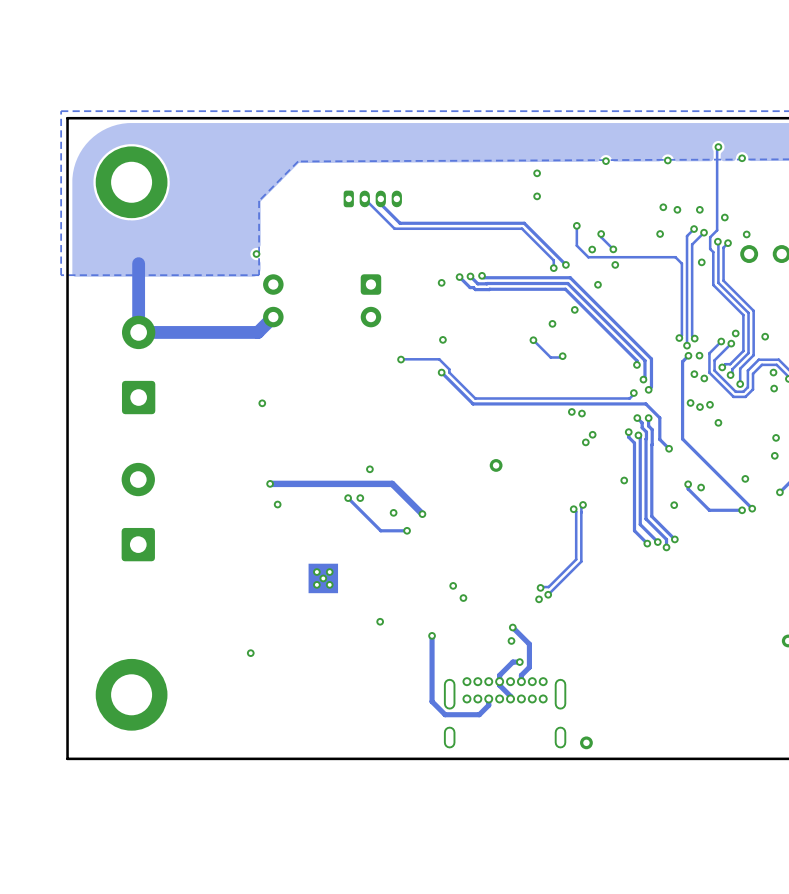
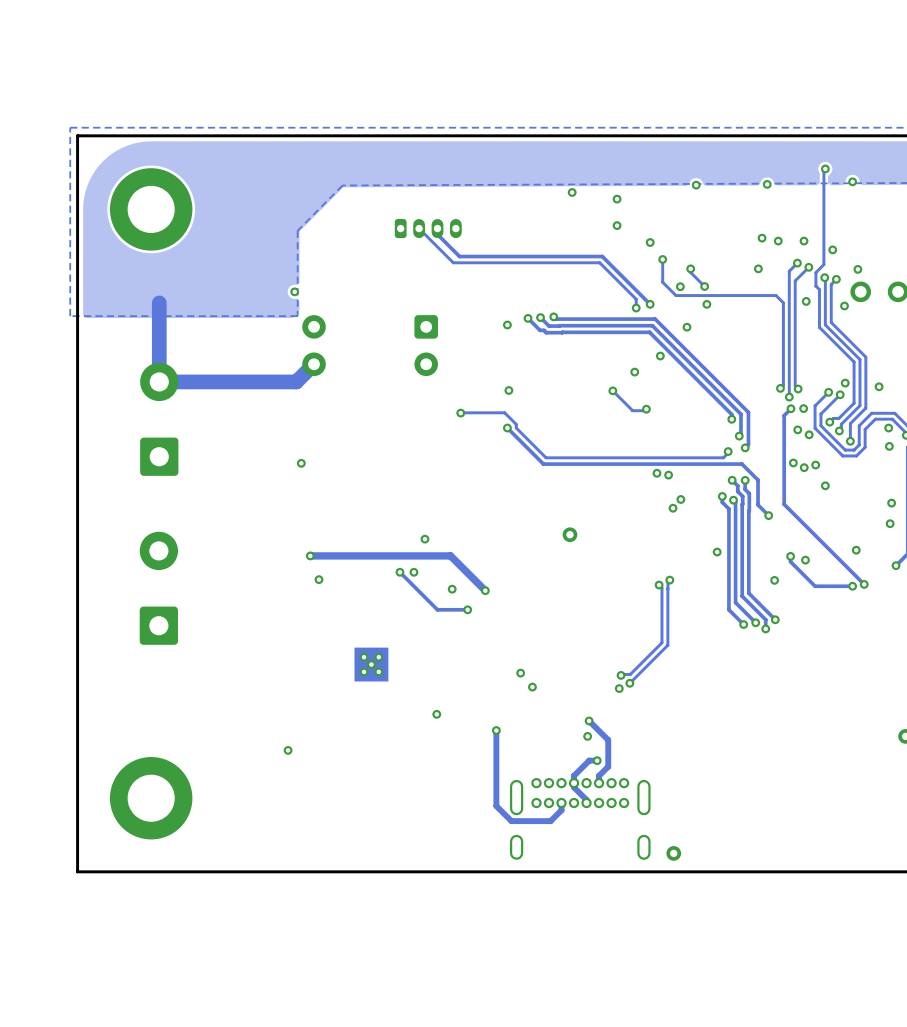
via: none -> (572, 192)
via: none -> (650, 242)
via: none -> (844, 305)

